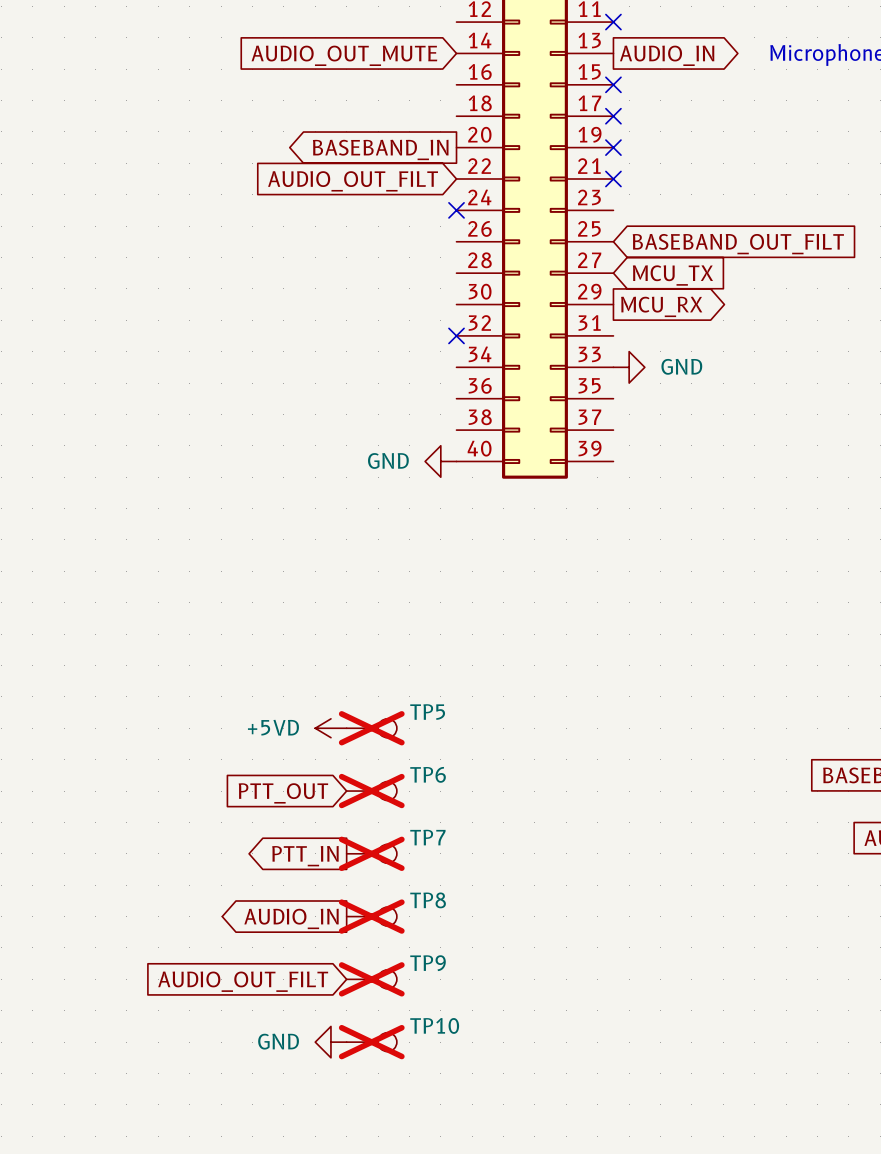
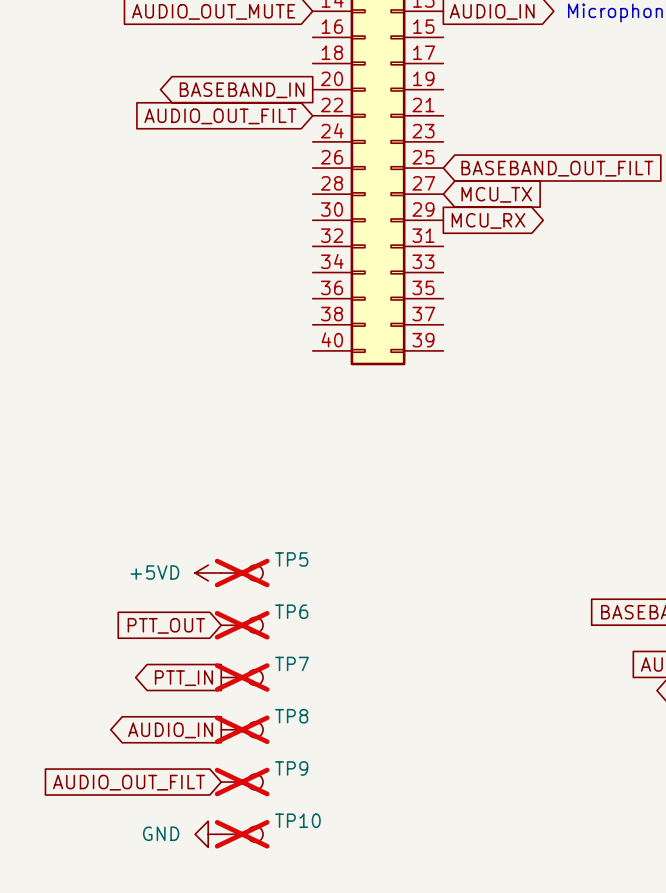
no-connect mark: (613, 84) -> none
no-connect mark: (613, 116) -> none
no-connect mark: (613, 147) -> none
no-connect mark: (613, 178) -> none
no-connect mark: (456, 210) -> none
no-connect mark: (456, 335) -> none
power symbol: GND (629, 367) -> none
power symbol: GND (440, 461) -> none

